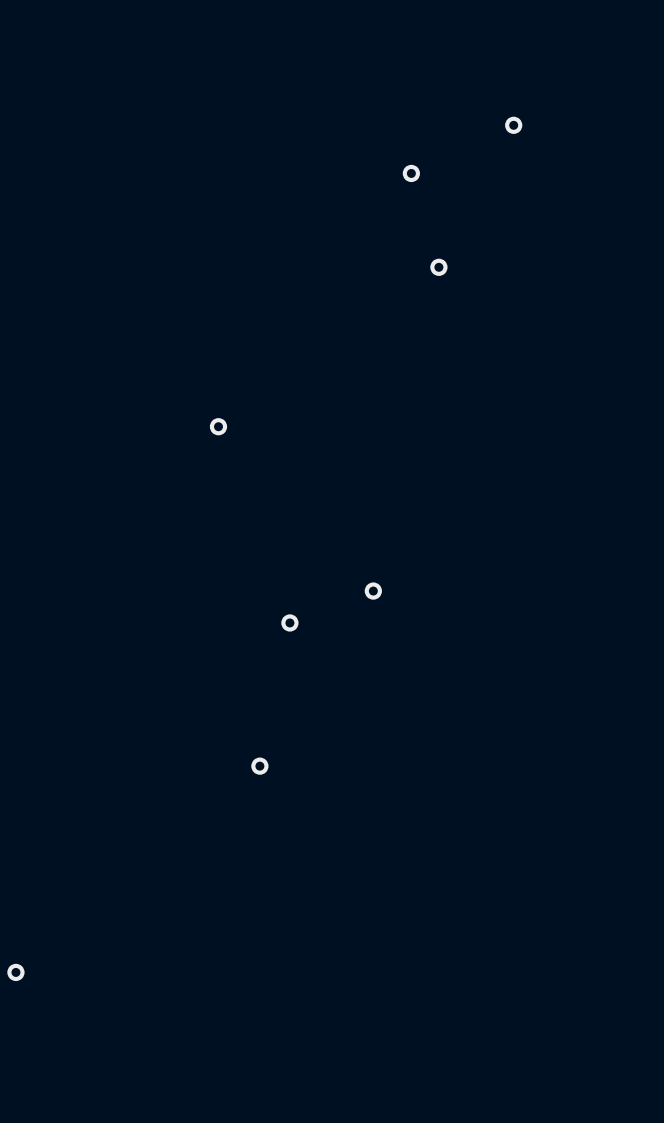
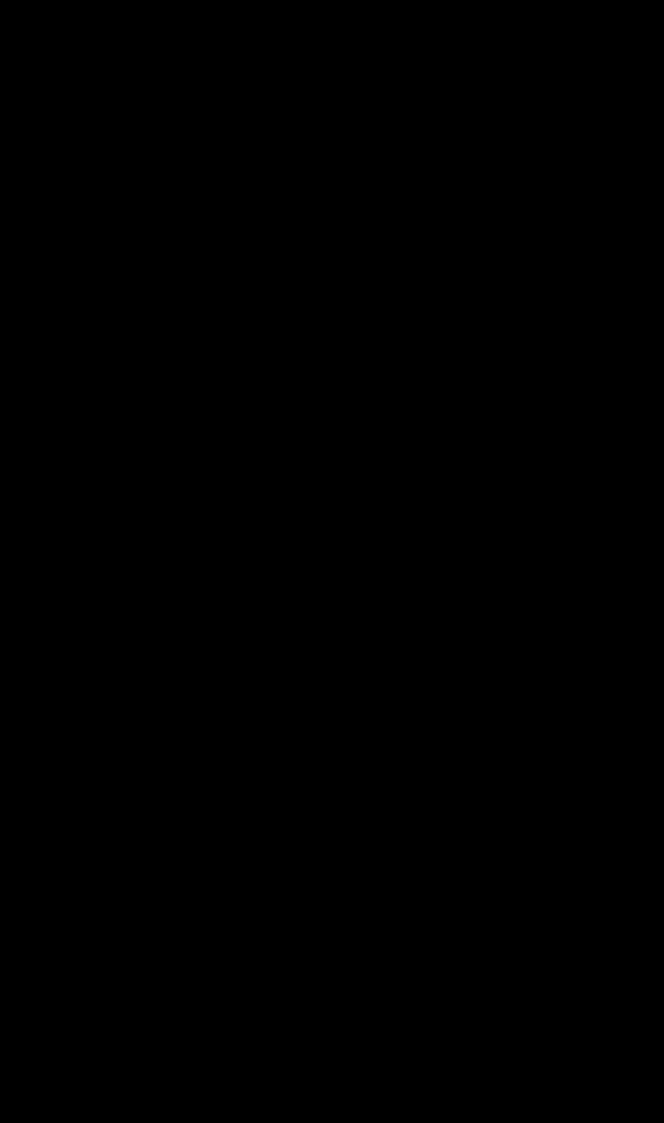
via: (513, 125) -> none
via: (411, 173) -> none
via: (438, 267) -> none
via: (218, 426) -> none
via: (373, 591) -> none
via: (289, 622) -> none
via: (259, 766) -> none
via: (15, 972) -> none

